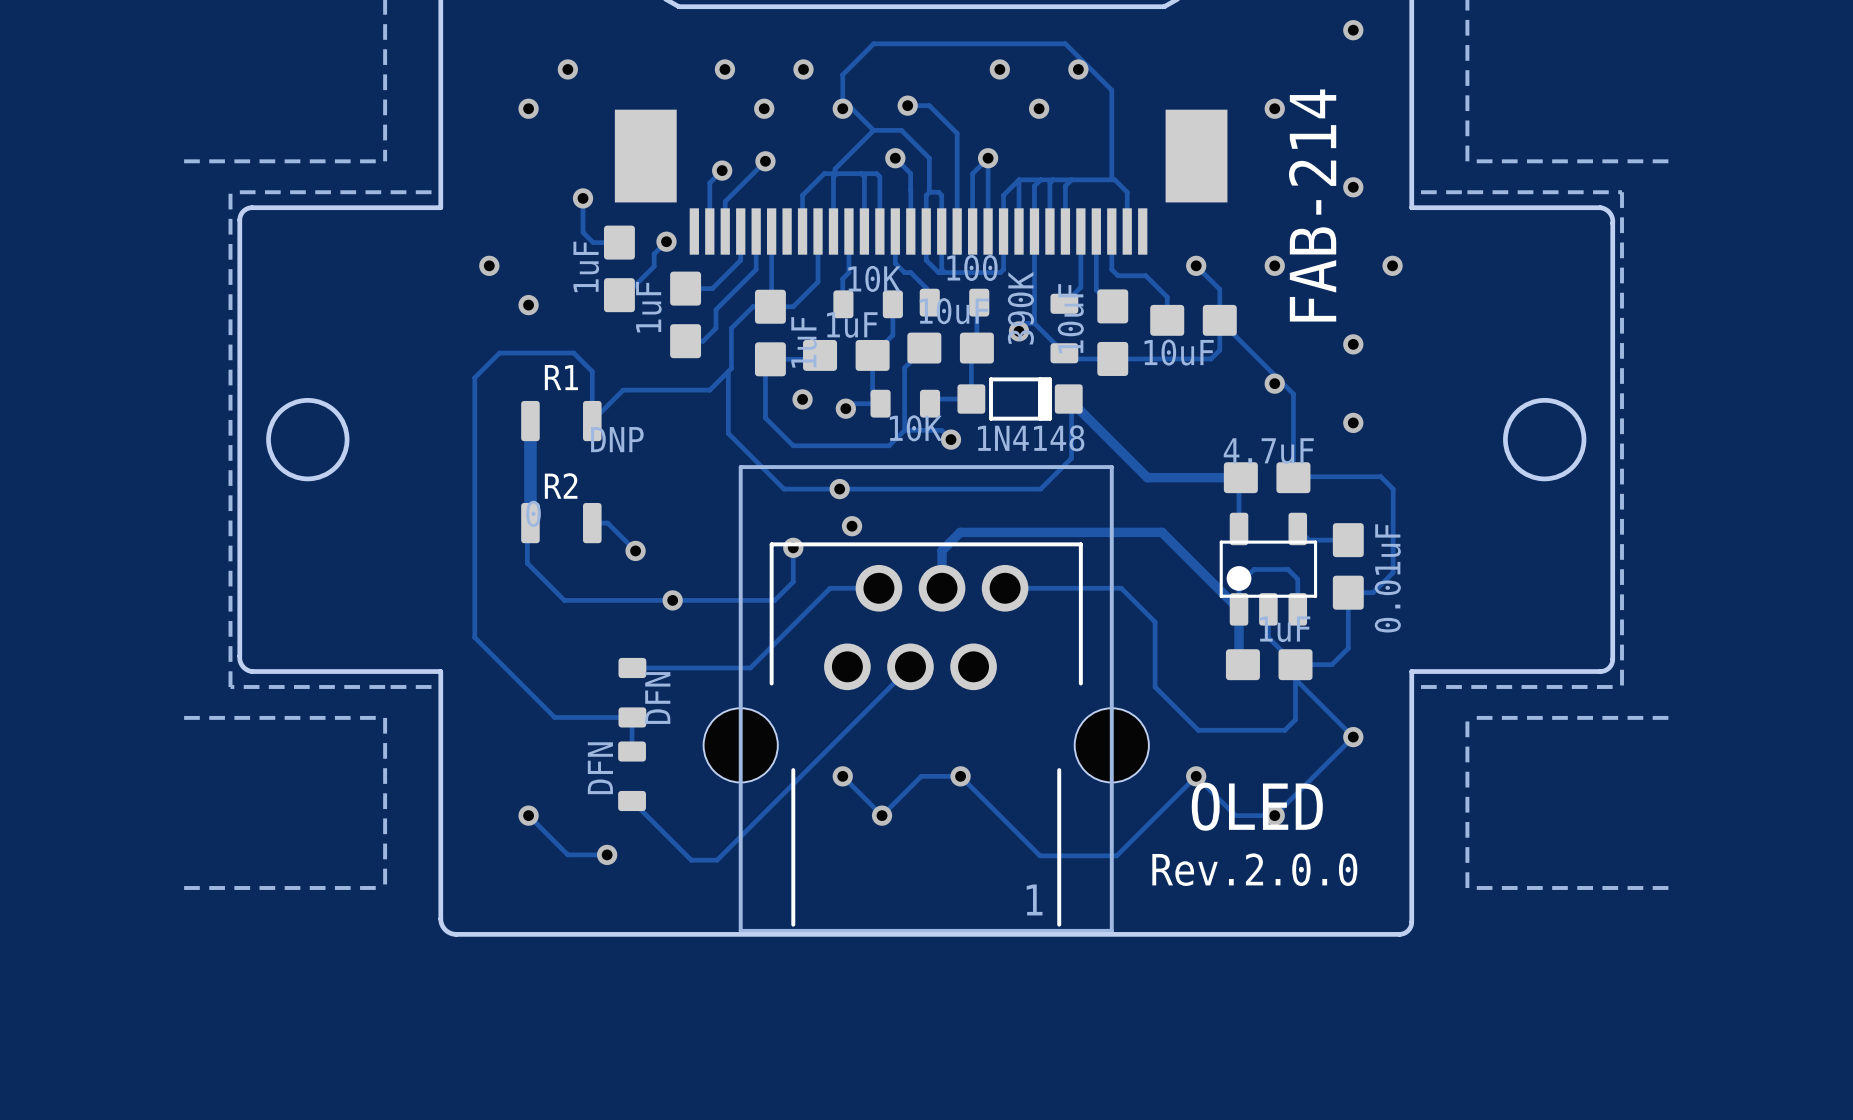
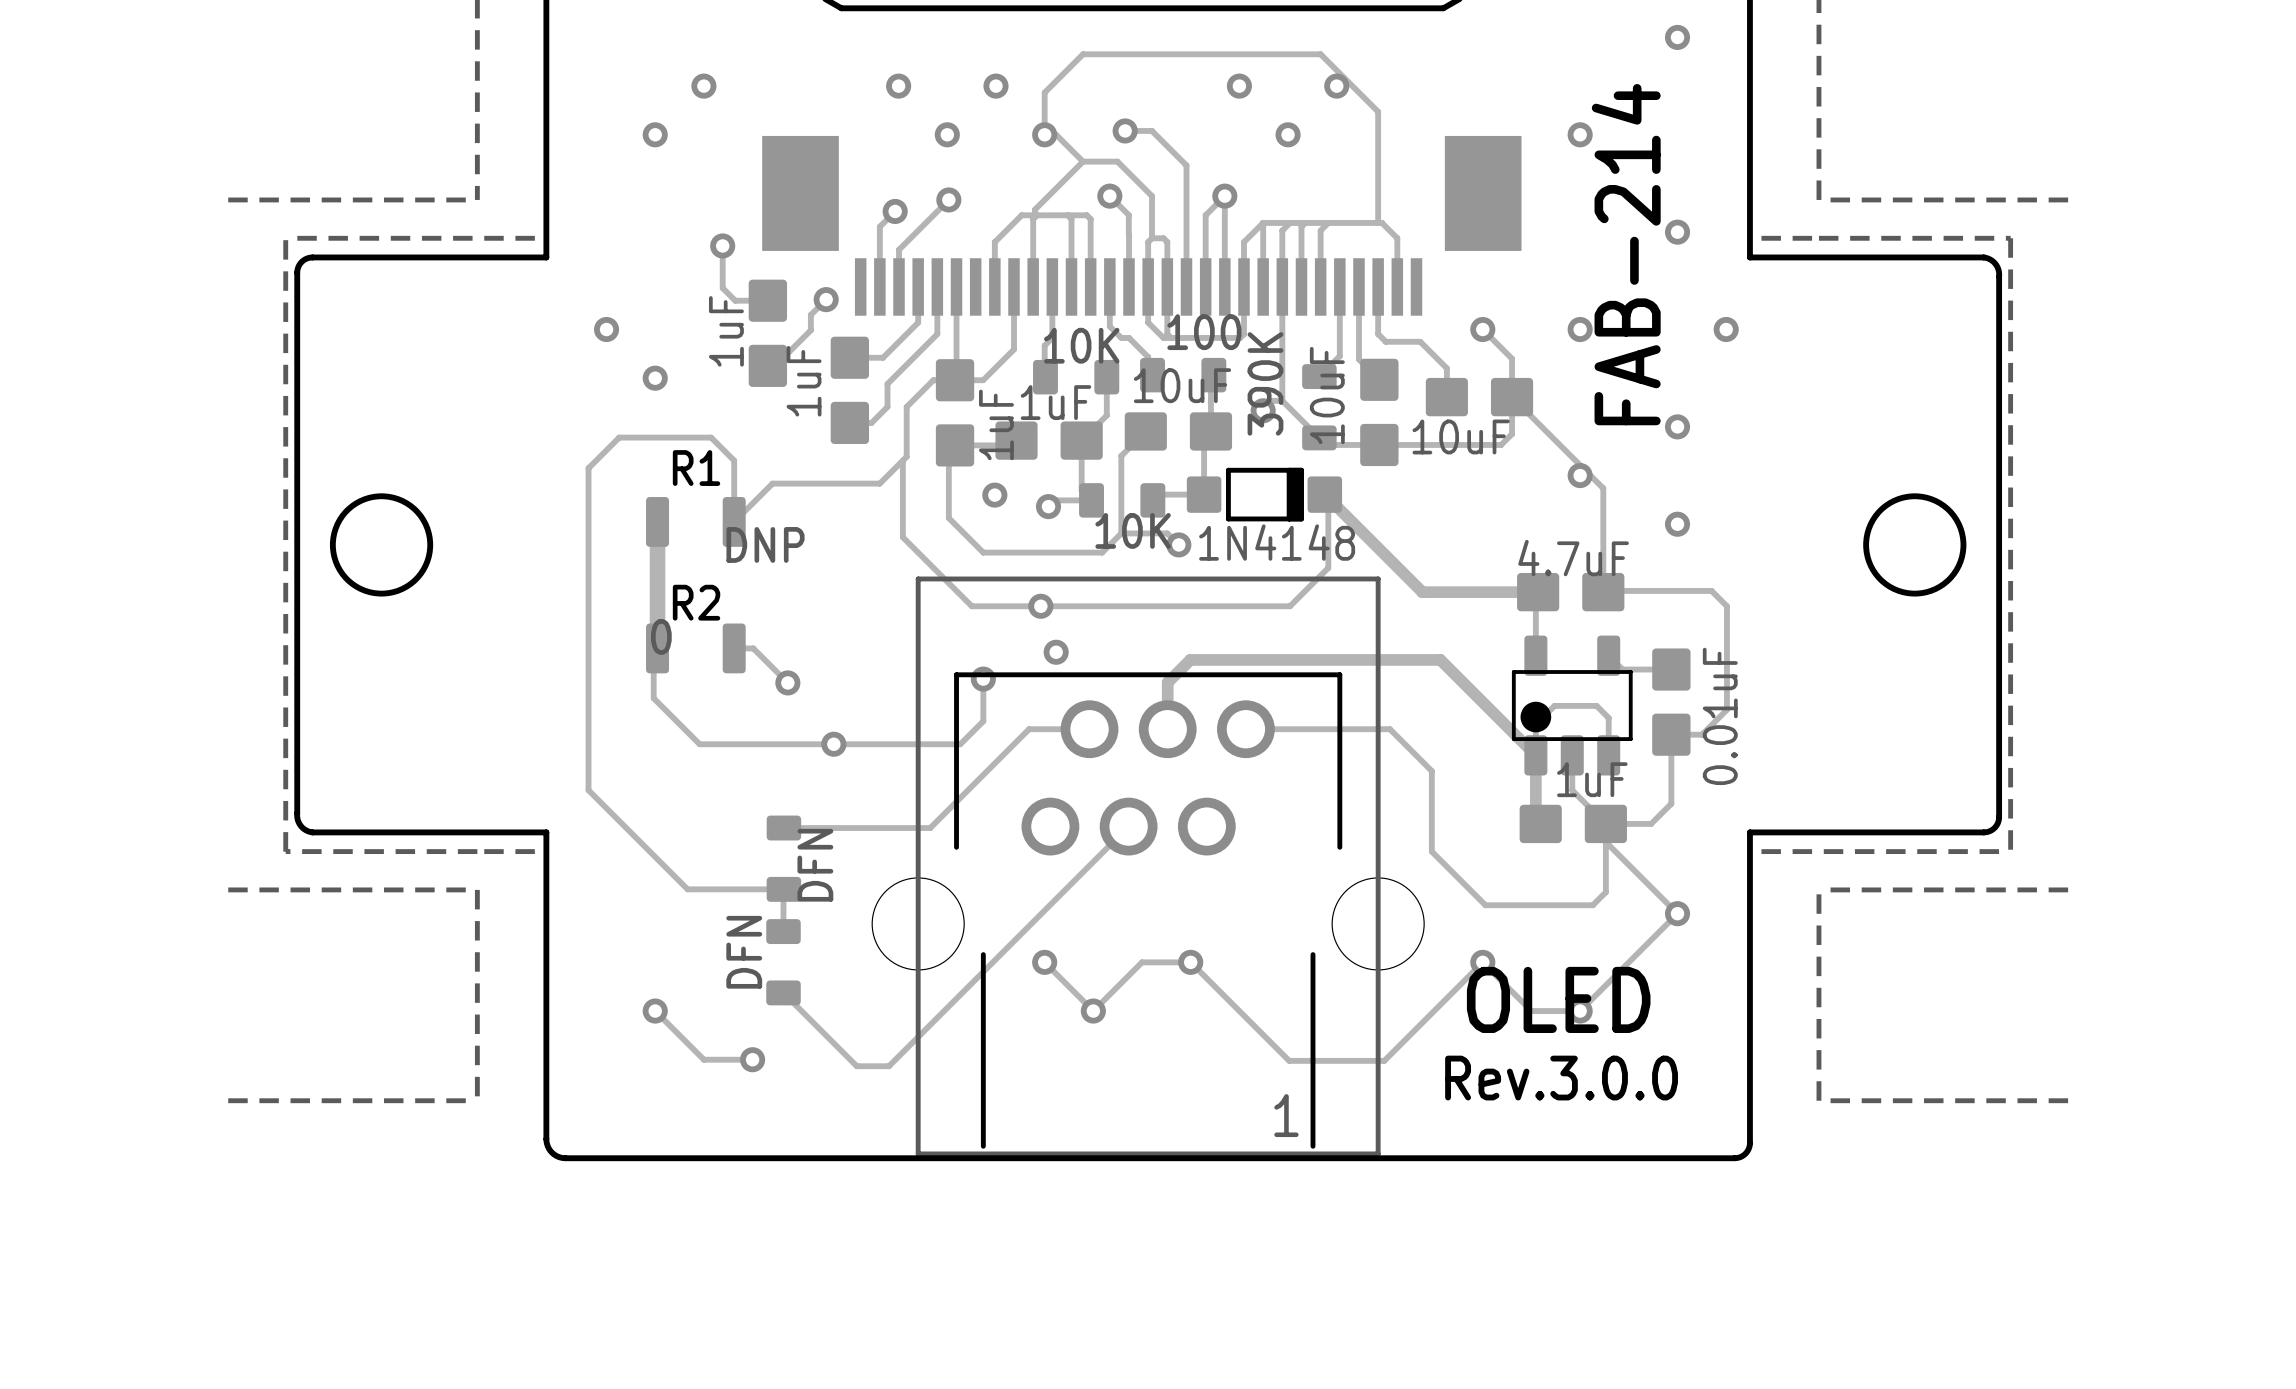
text: Rev.2.0.0 (1254, 869) -> Rev.3.0.0 (1561, 1078)

